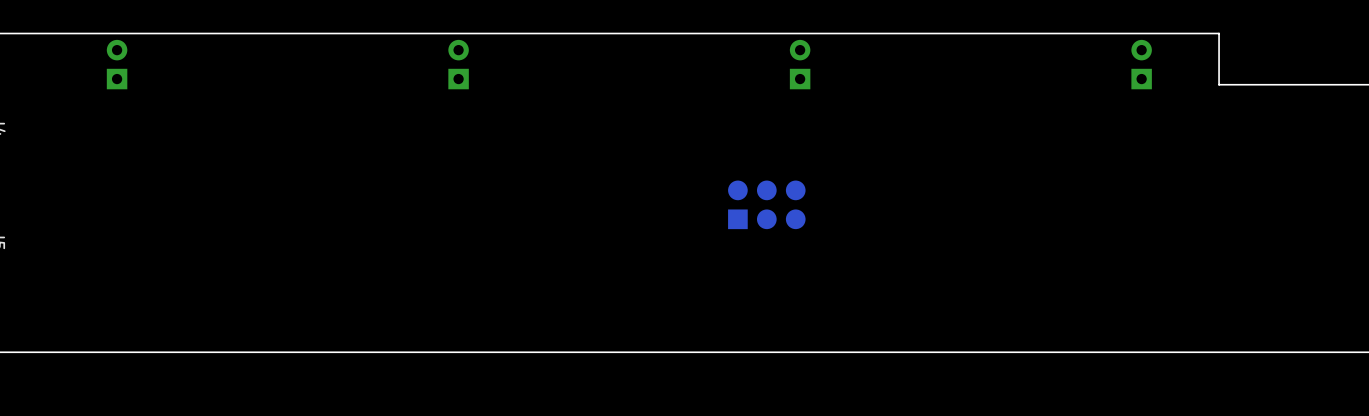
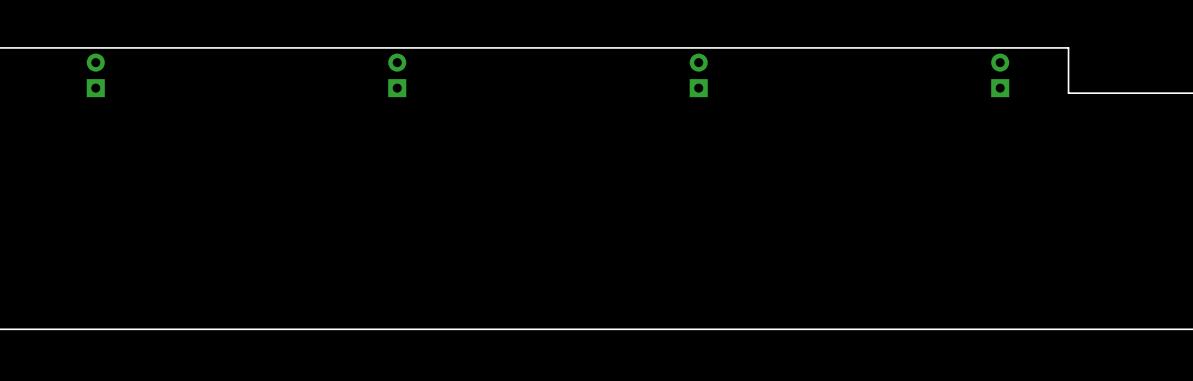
part: (766, 204) -> none

